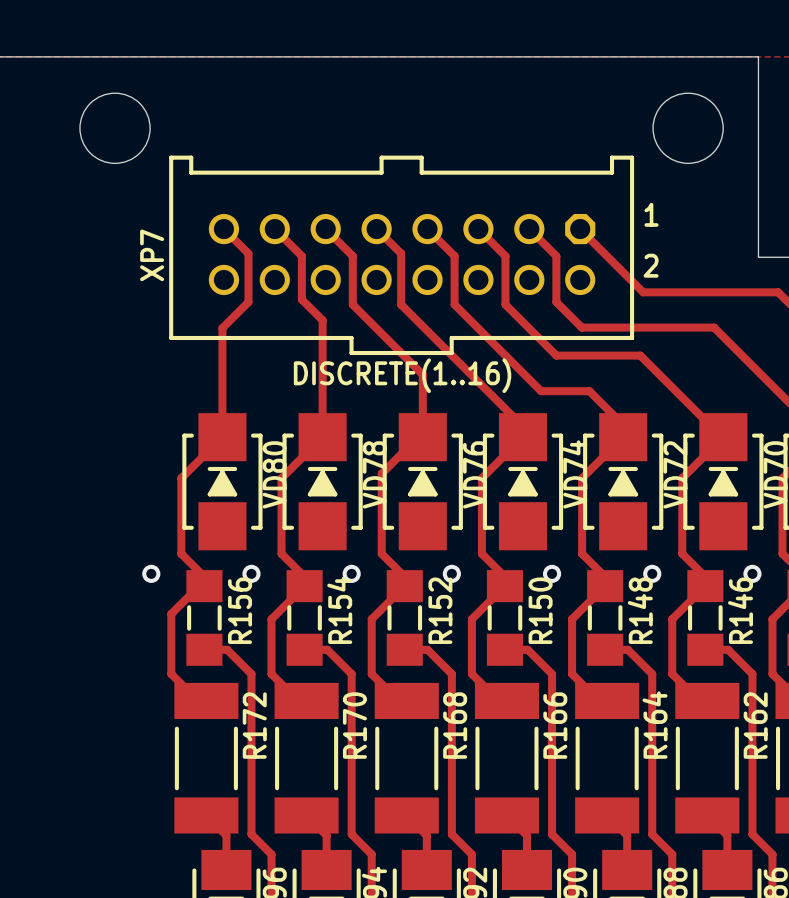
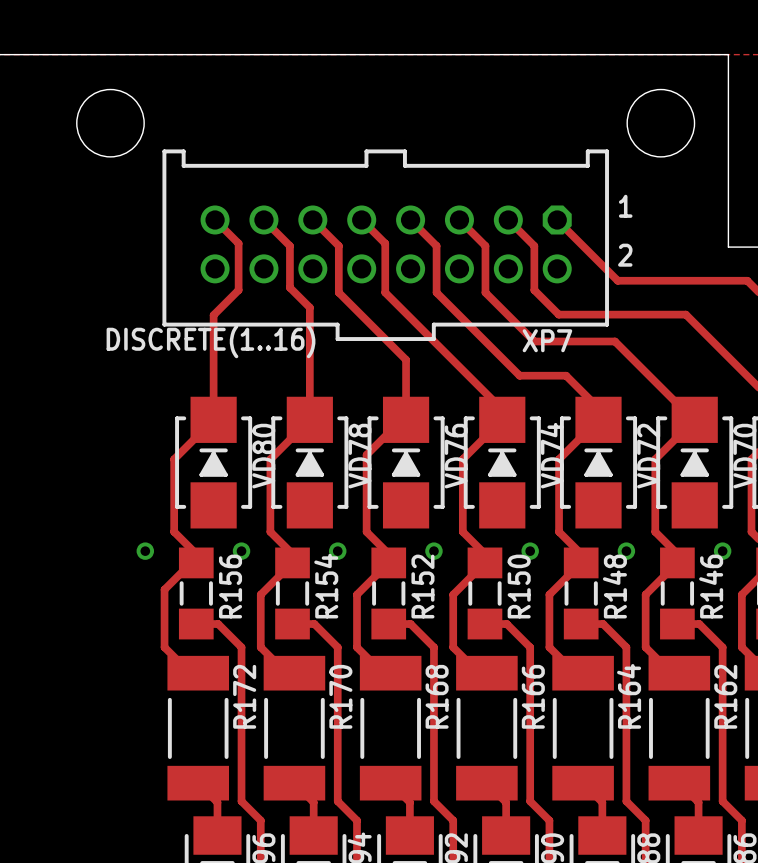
XP7 name rotation: 0° (152, 255) -> 90° clockwise (547, 340)
XP7 name position: XP7 (152, 255) -> XP7 (547, 340)
XP7 text position: DISCRETE(1..16) (402, 375) -> DISCRETE(1..16) (211, 341)

